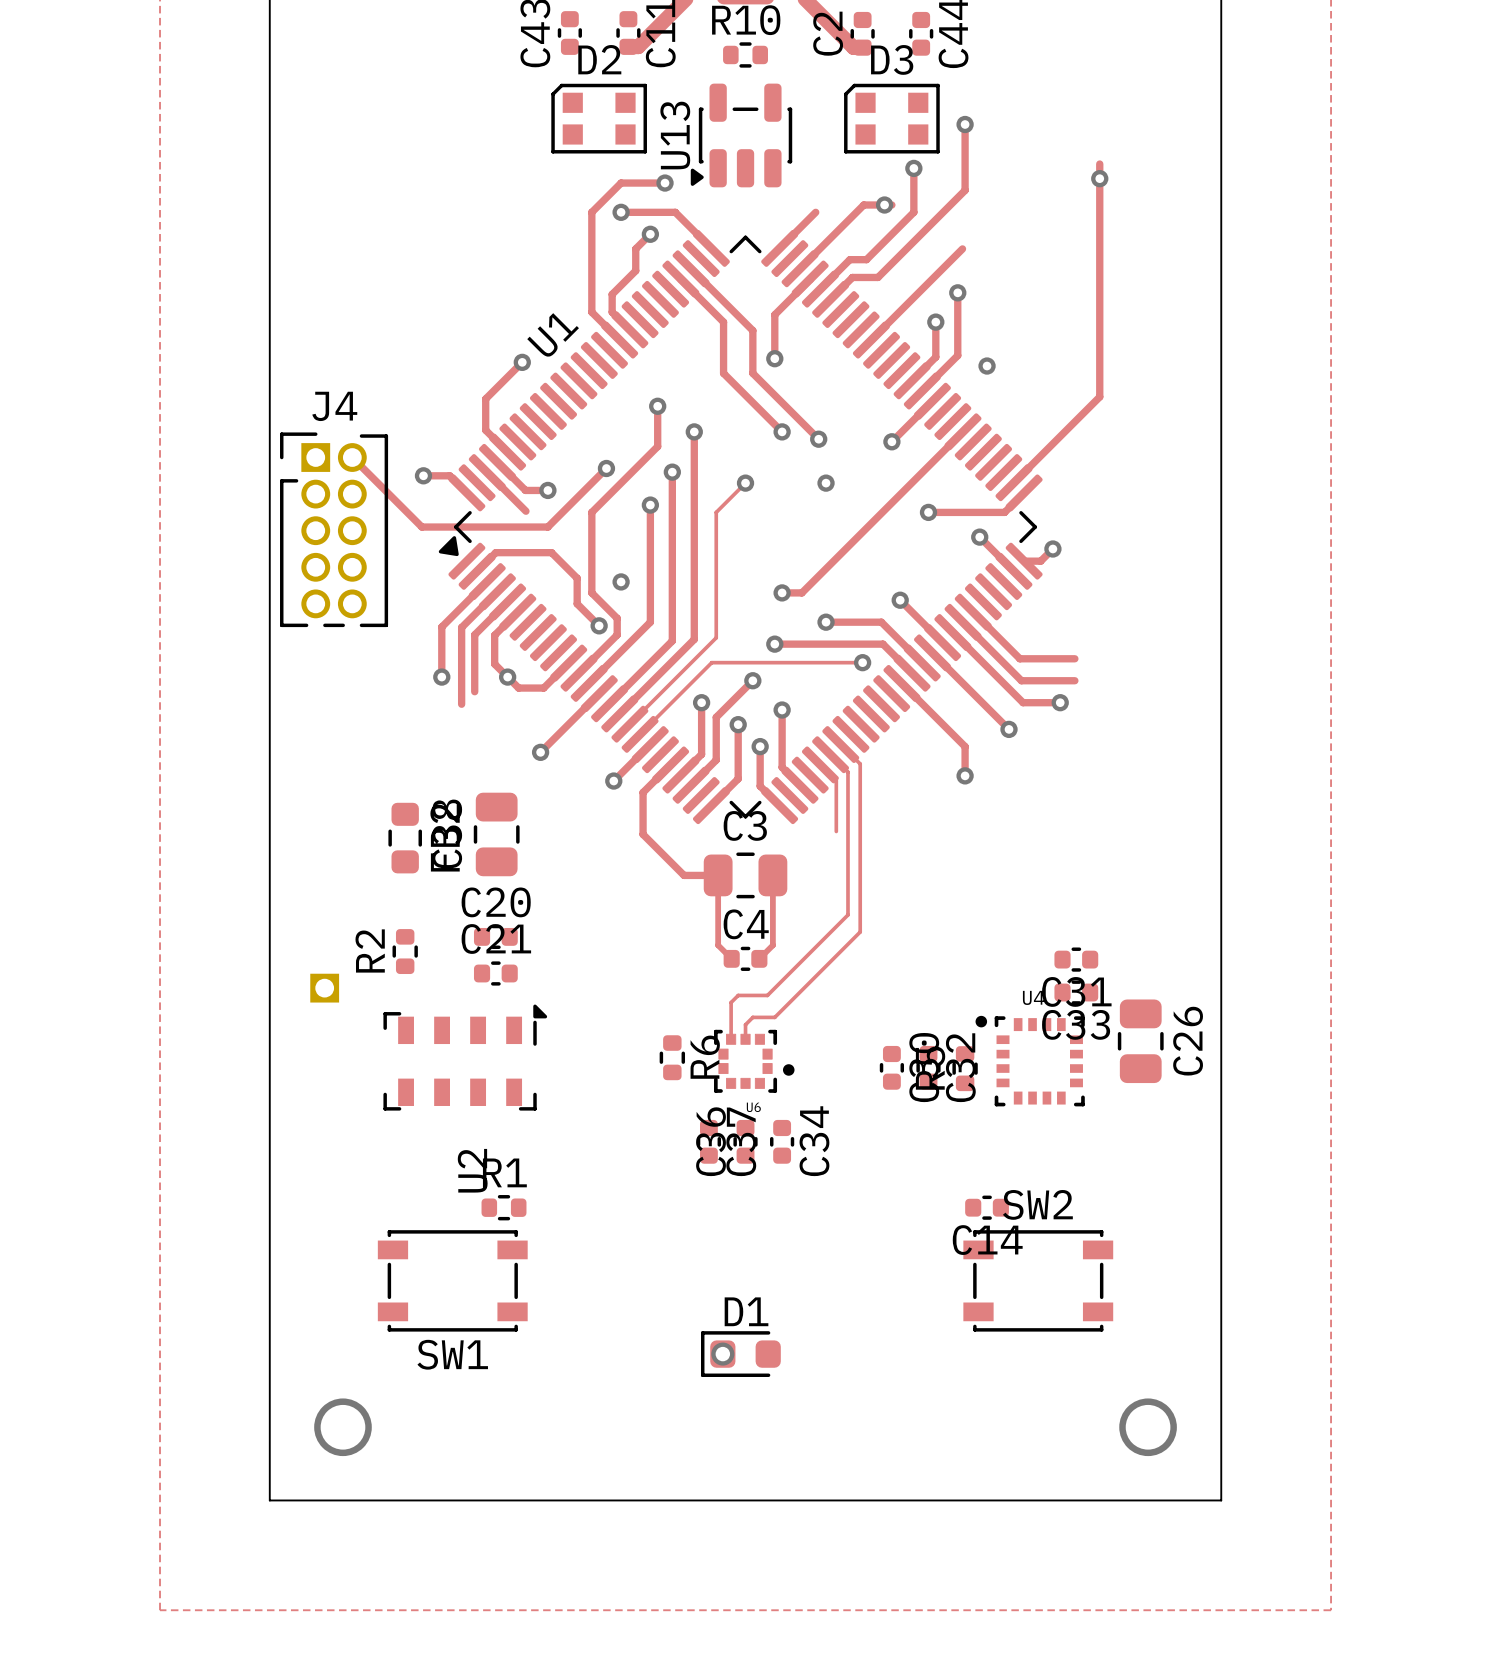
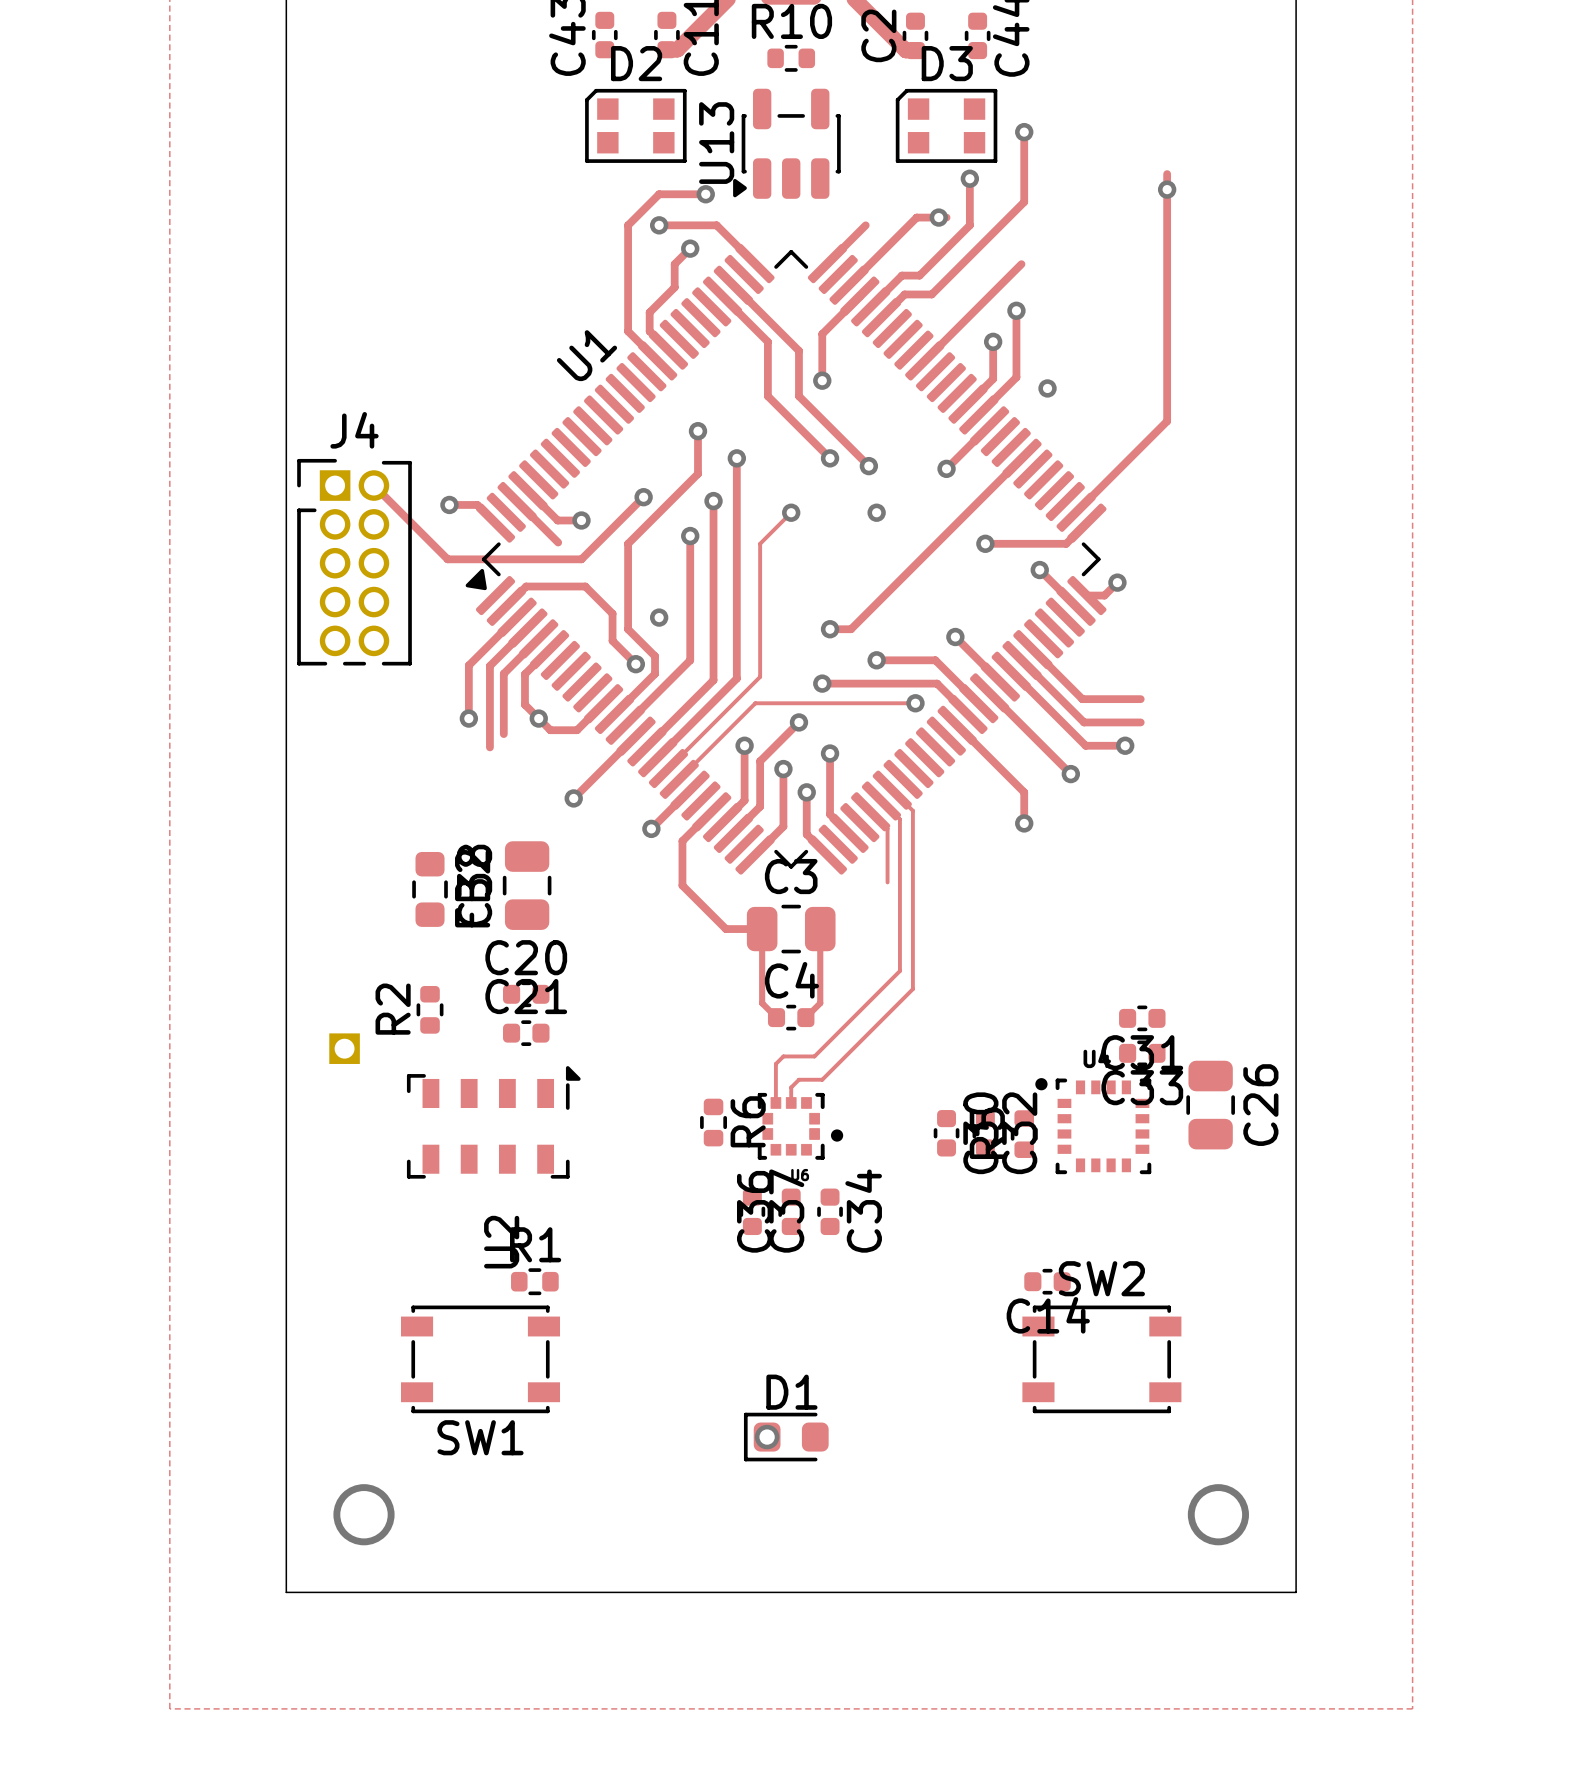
track: (522, 362) (485, 398) (485, 430) (507, 452) -> none
via: (522, 362) -> none

